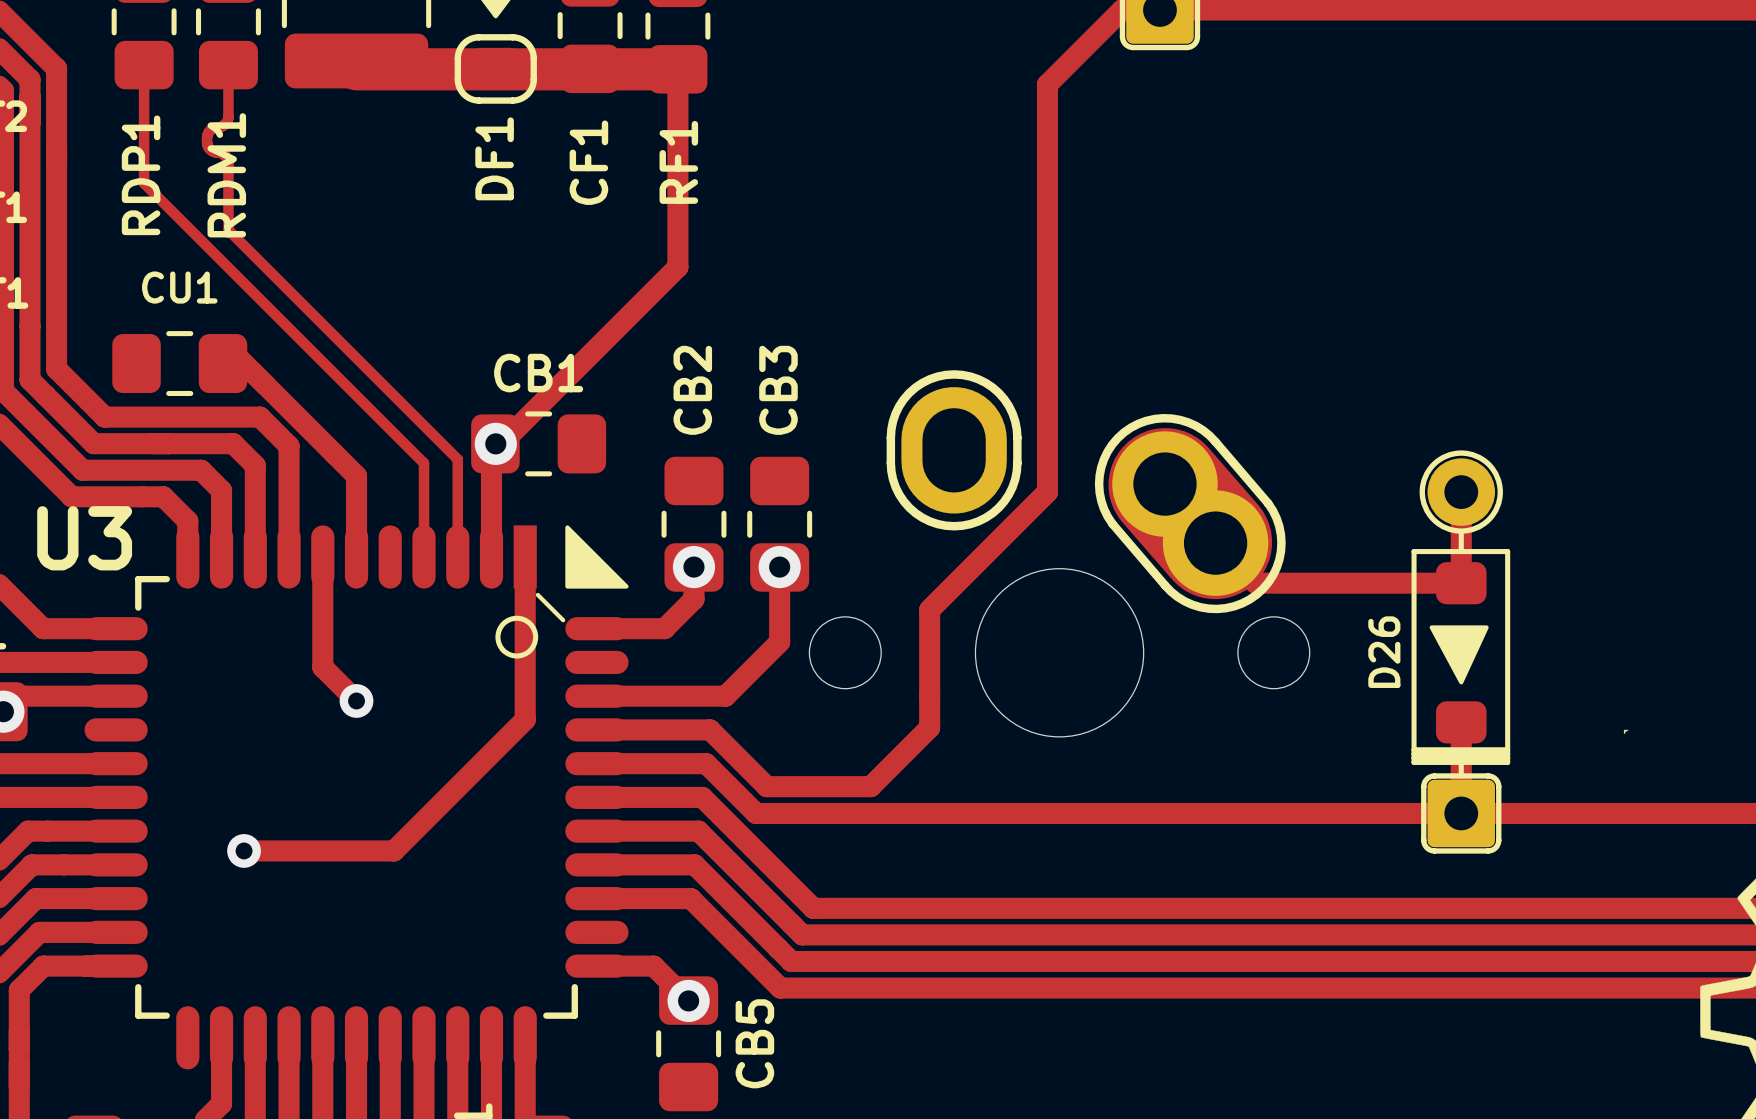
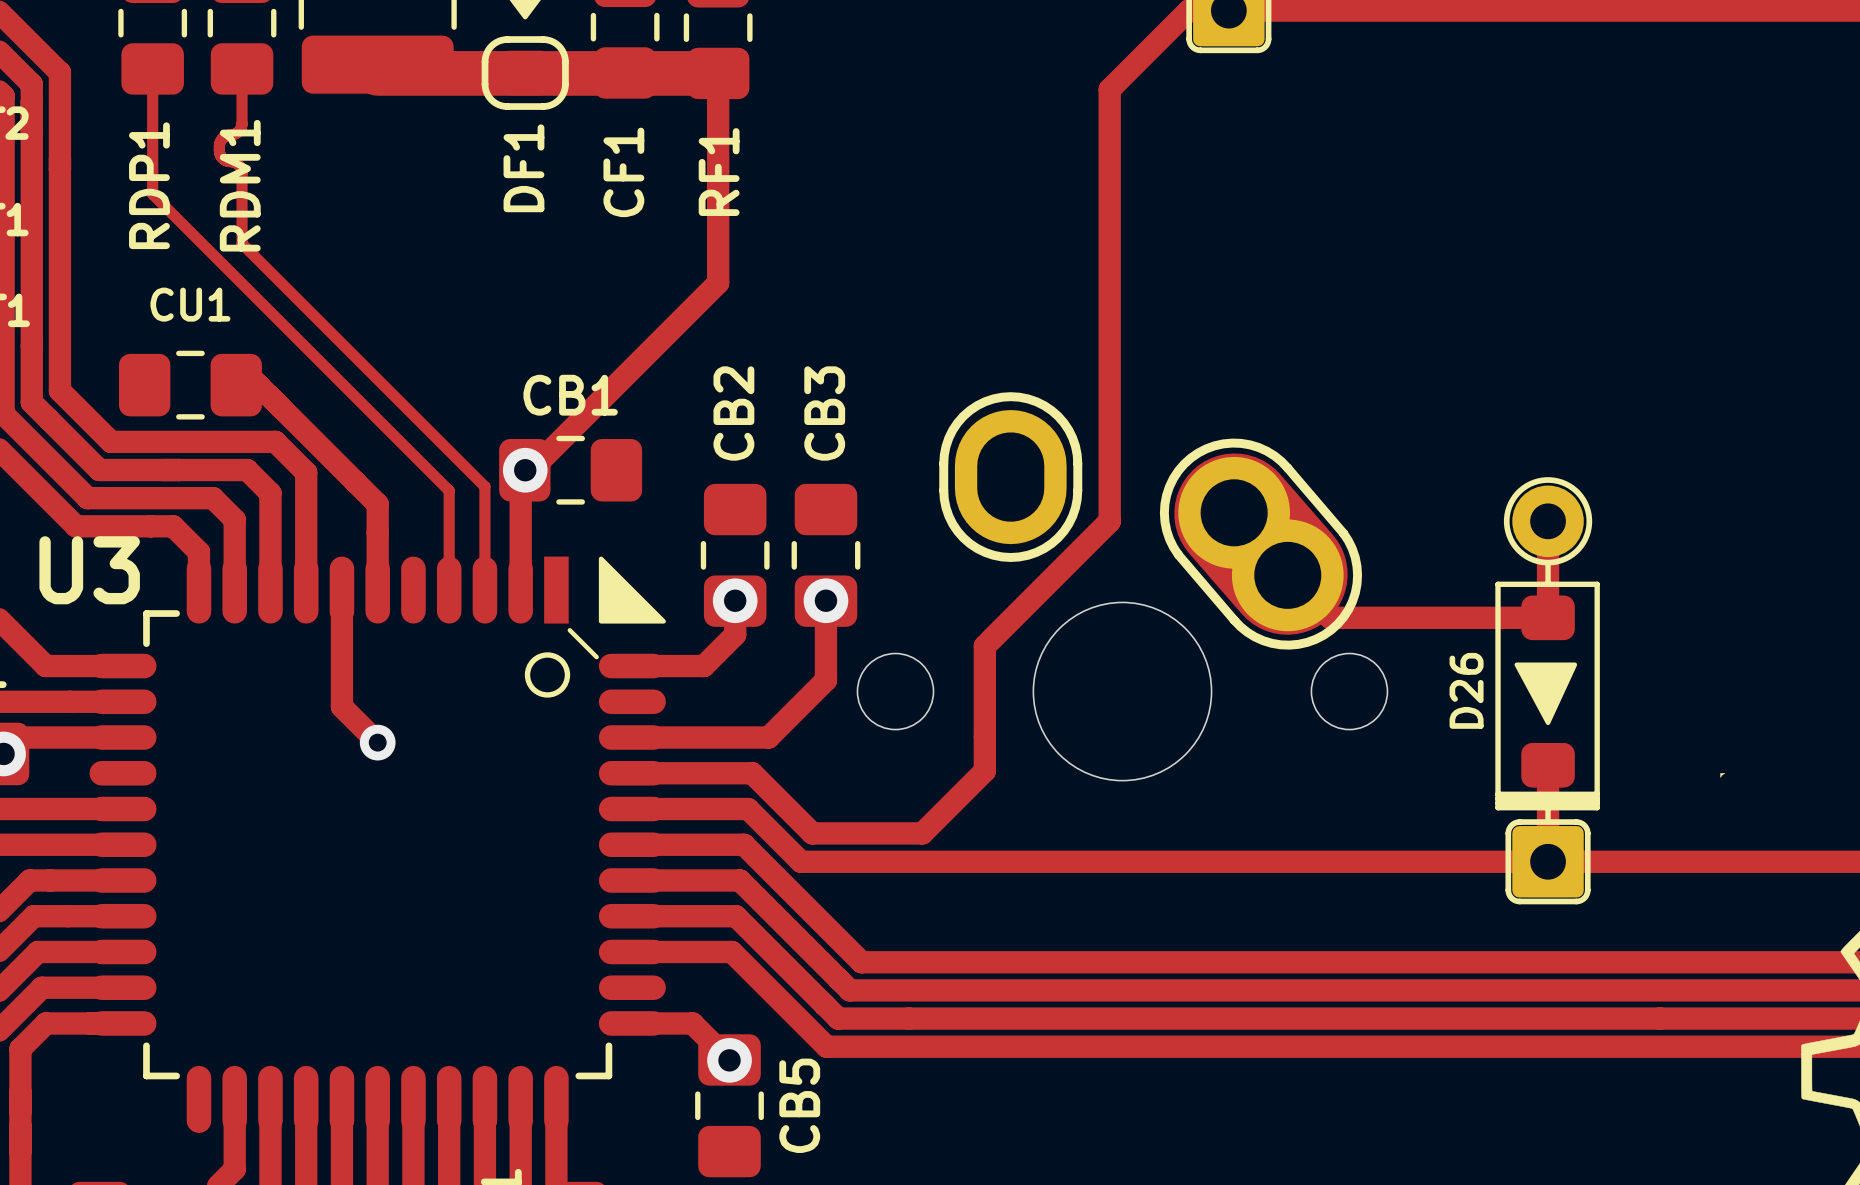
track: (525, 557) (525, 719) (394, 850) (244, 850) -> none
via: (244, 850) -> none

